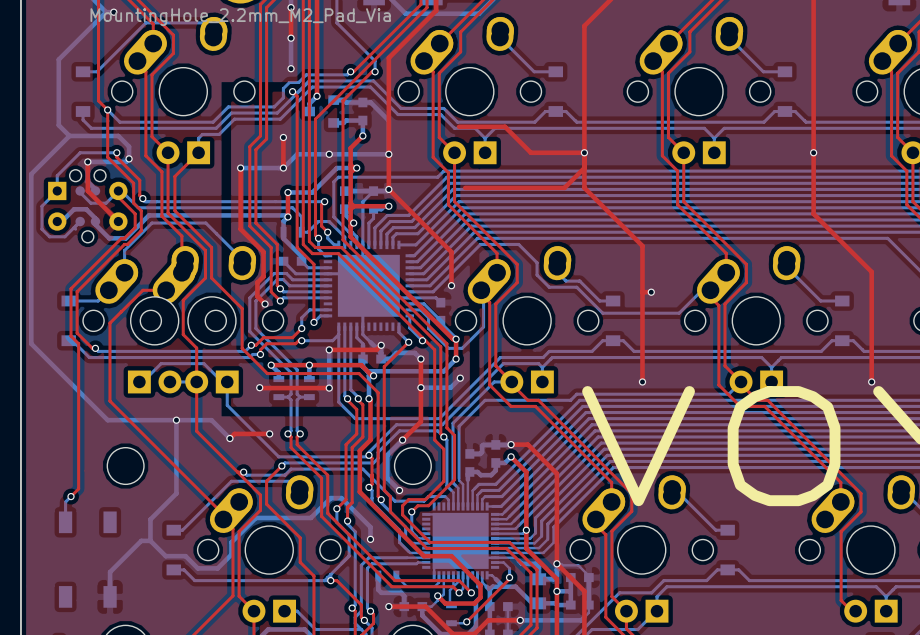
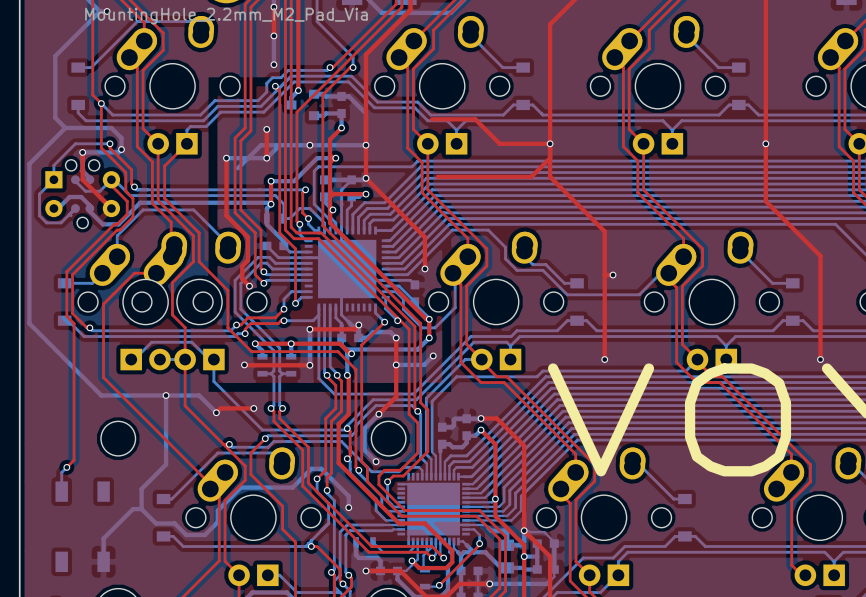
bottom track: none -> (279, 145) (261, 145) (237, 168)

